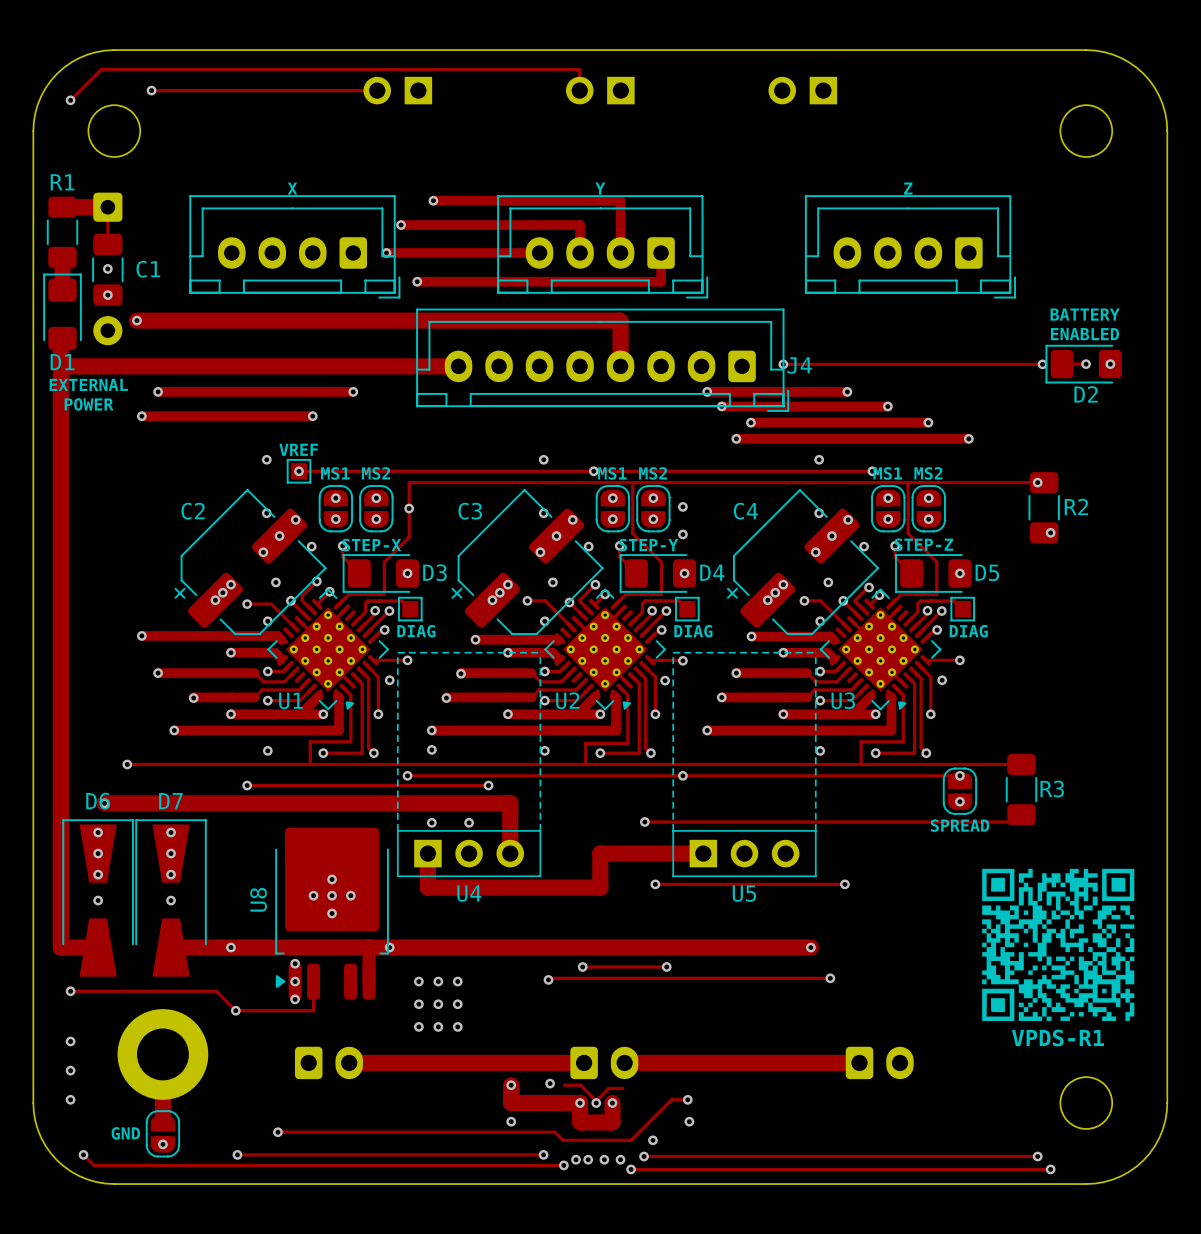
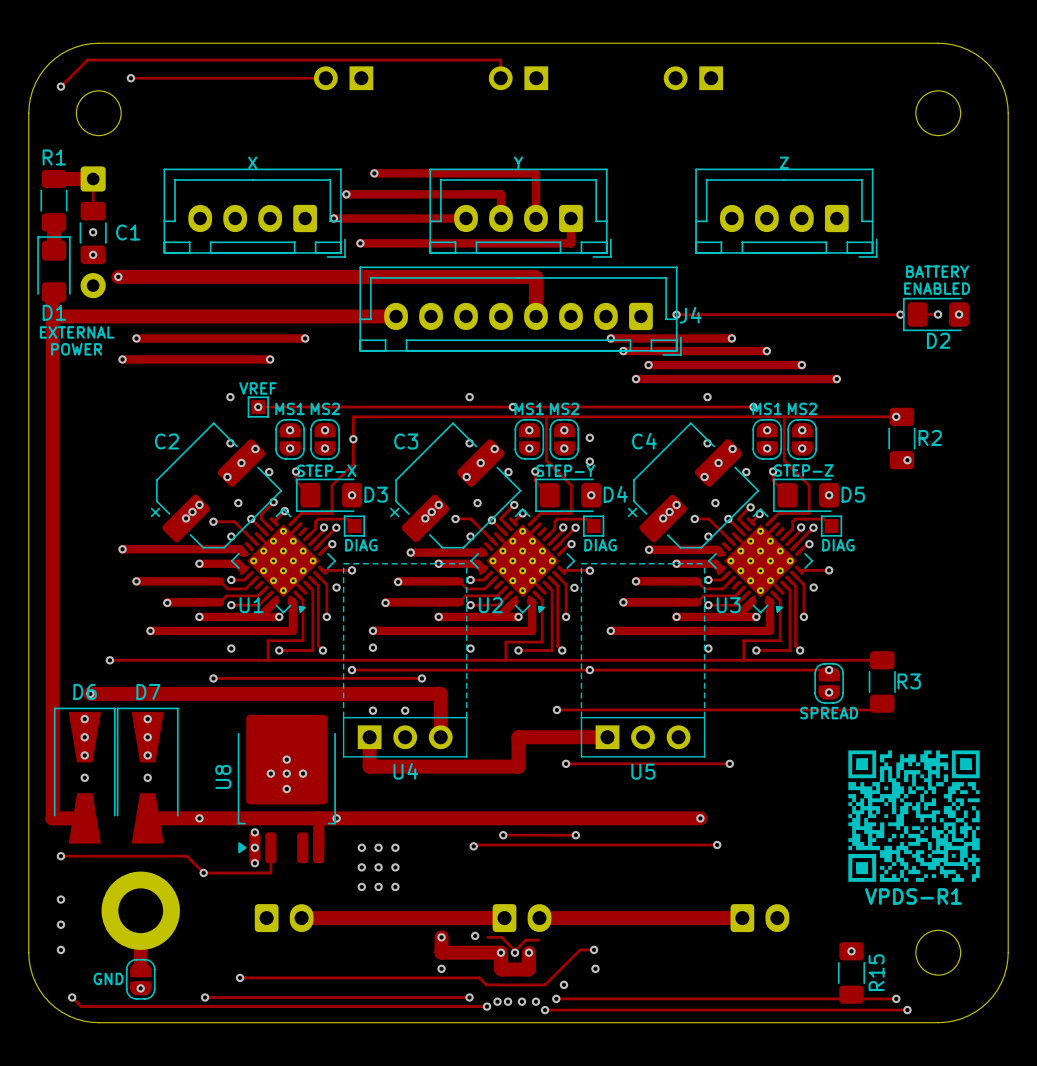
via: none -> (851, 951)
R15: none -> (851, 973)

